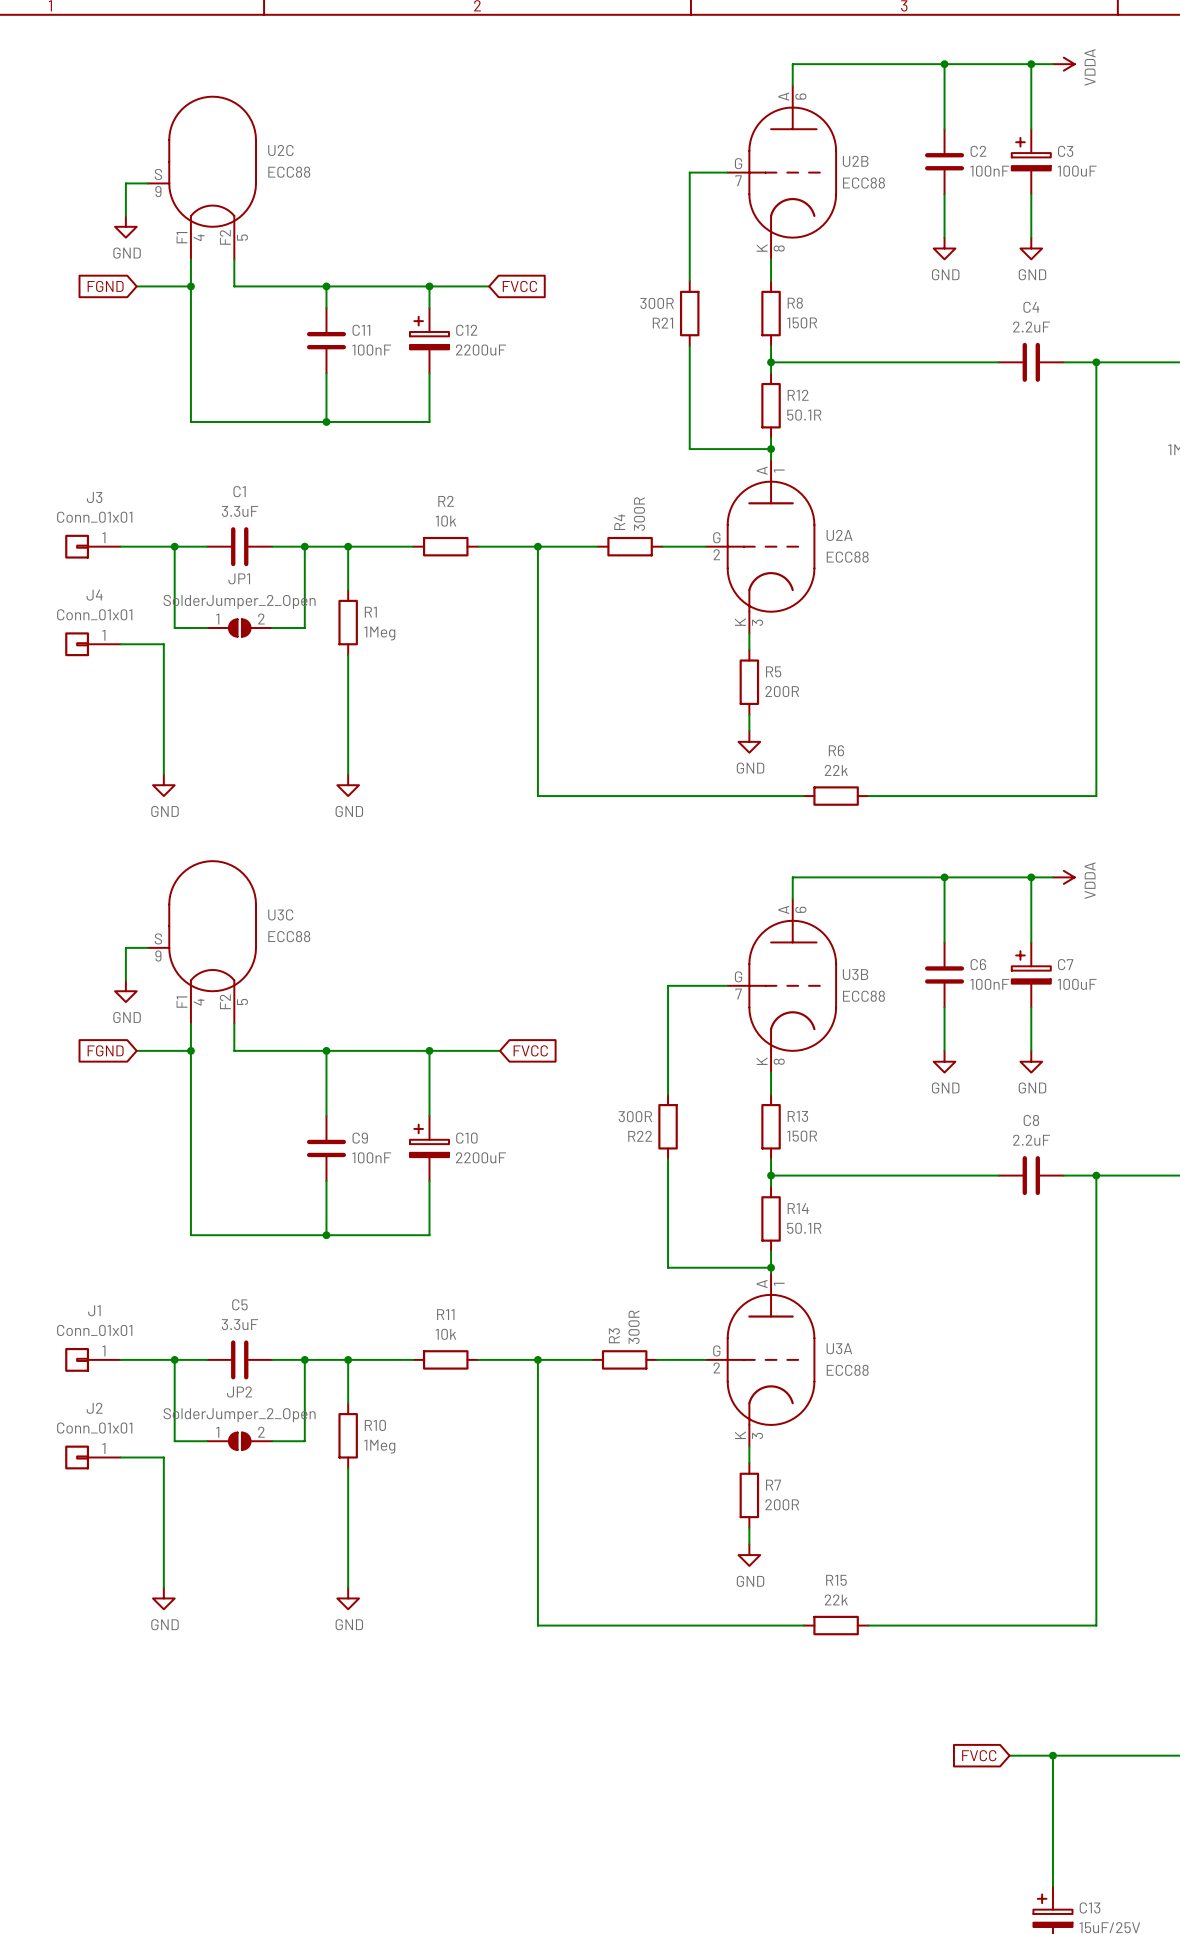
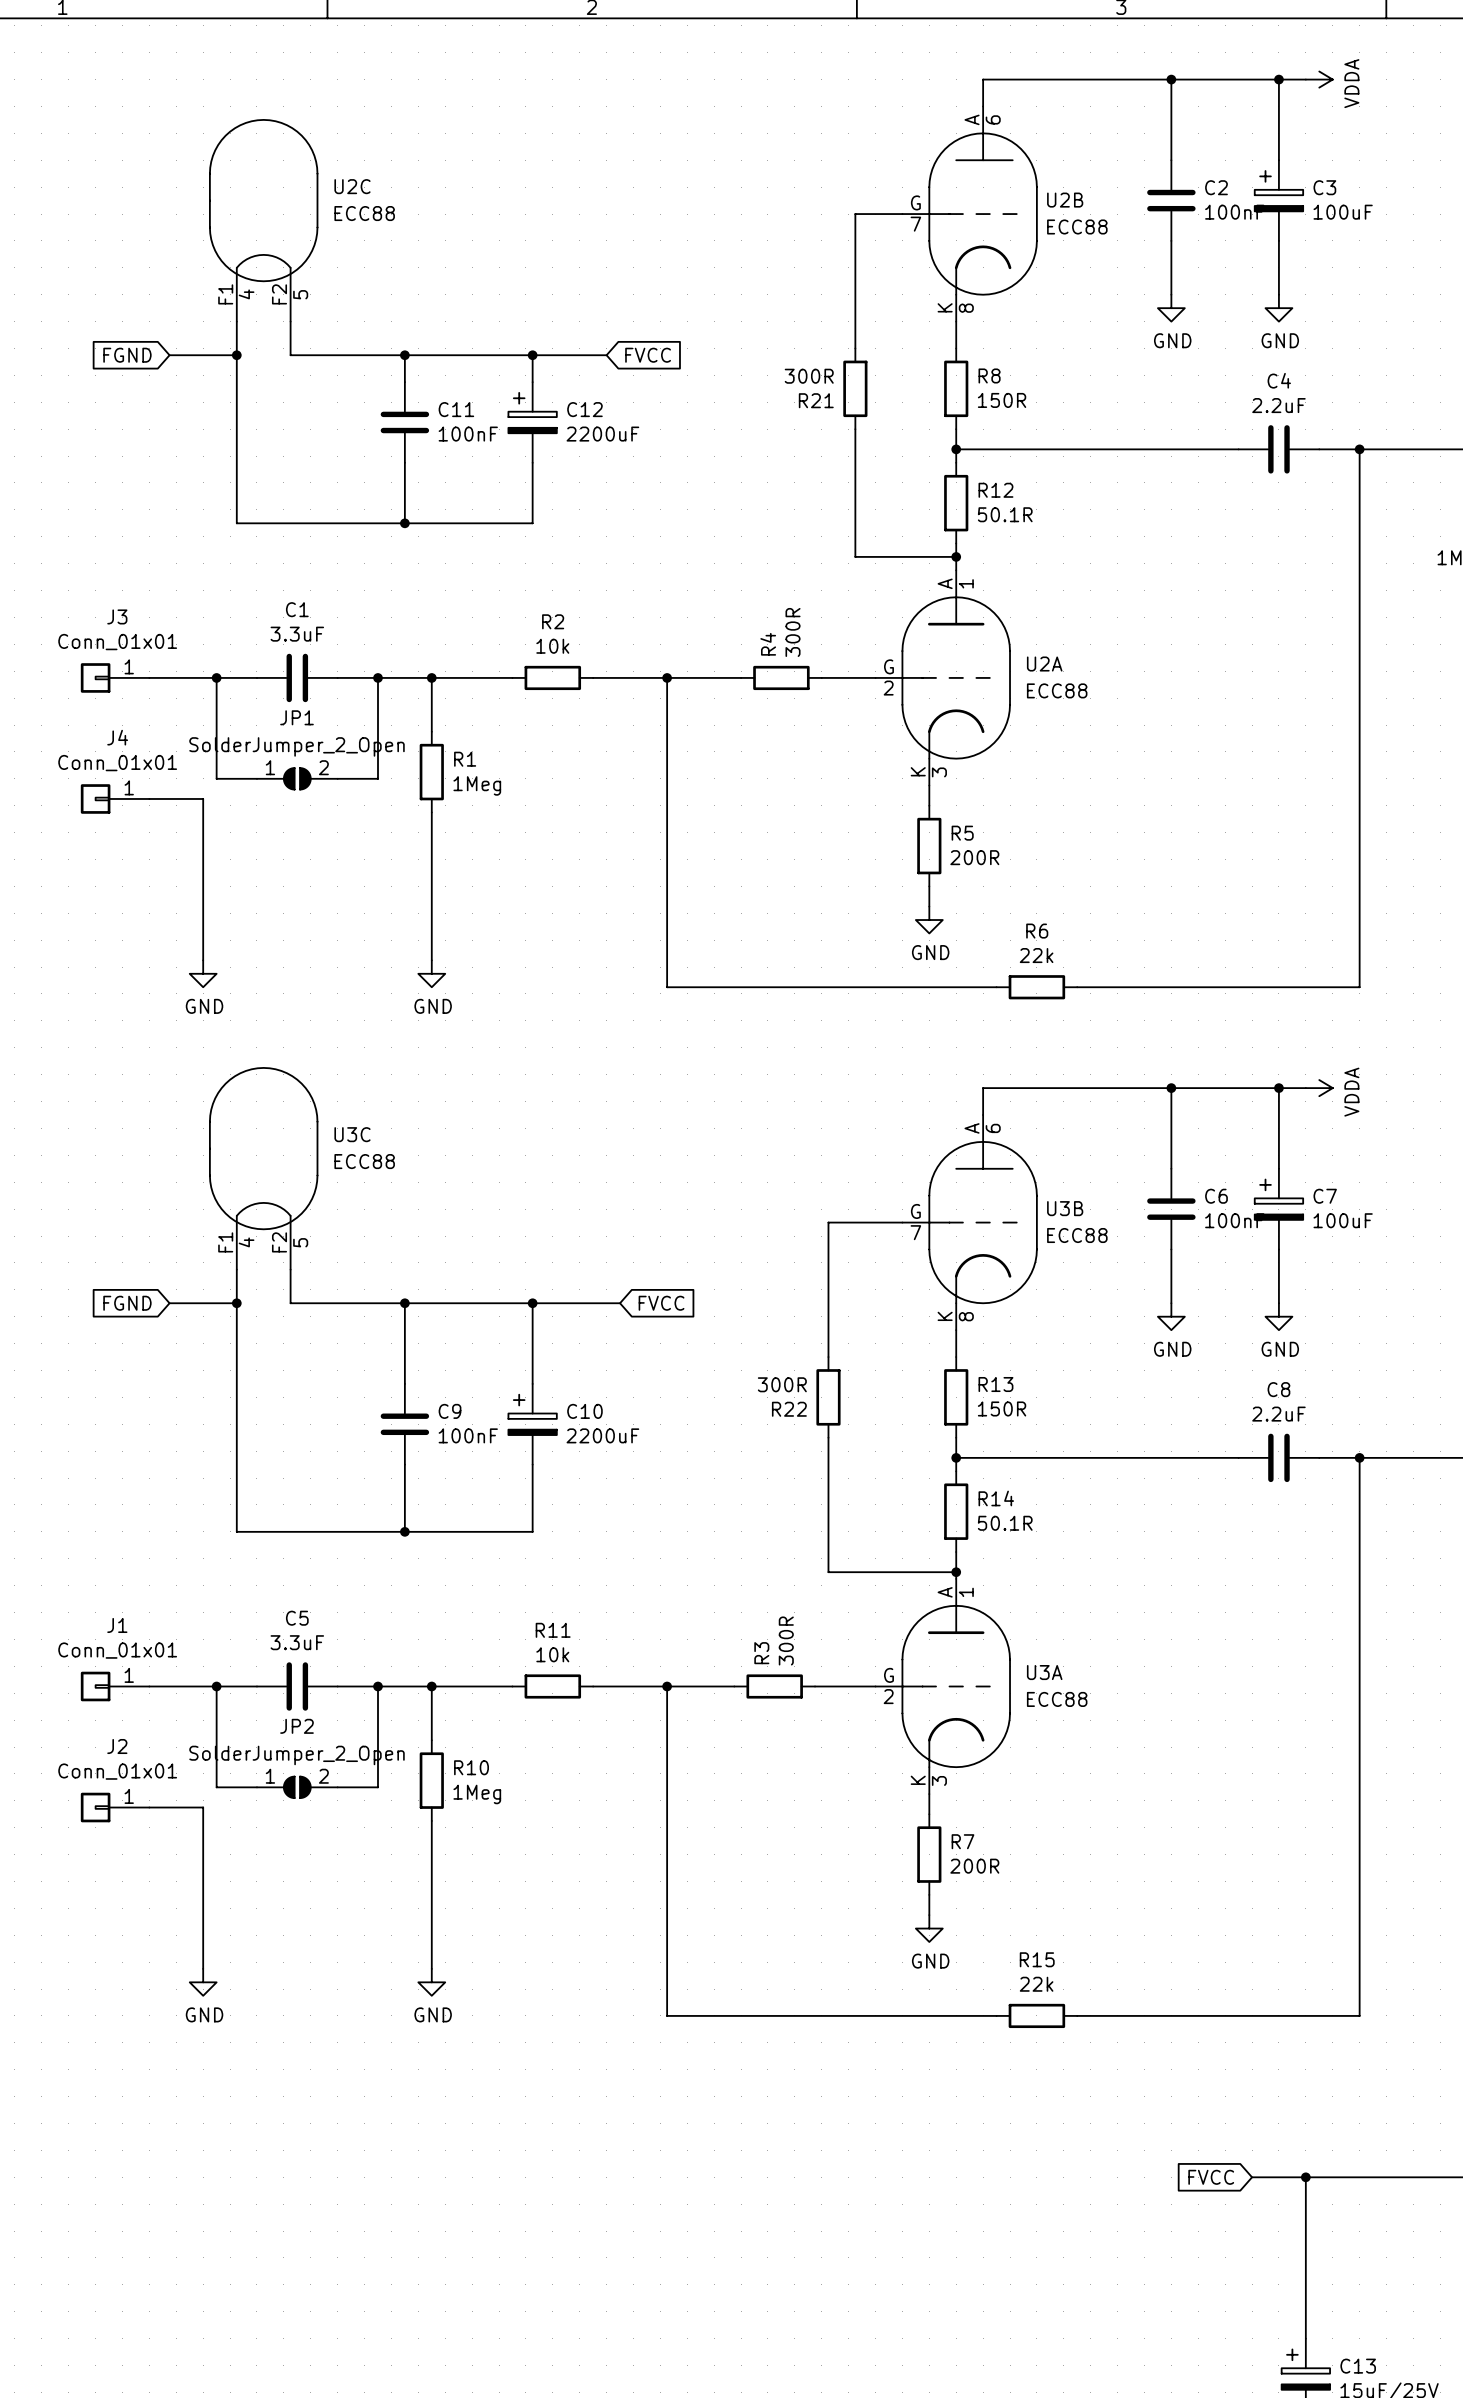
U2C symbol: [147, 96, 257, 260] -> [209, 119, 318, 322]
wire: (147, 183) (125, 183) (125, 215) -> none
power symbol: GND (125, 226) -> none
U3C symbol: [147, 861, 257, 1024] -> [209, 1067, 318, 1270]
wire: (147, 947) (125, 947) (125, 980) -> none
power symbol: GND (125, 991) -> none

